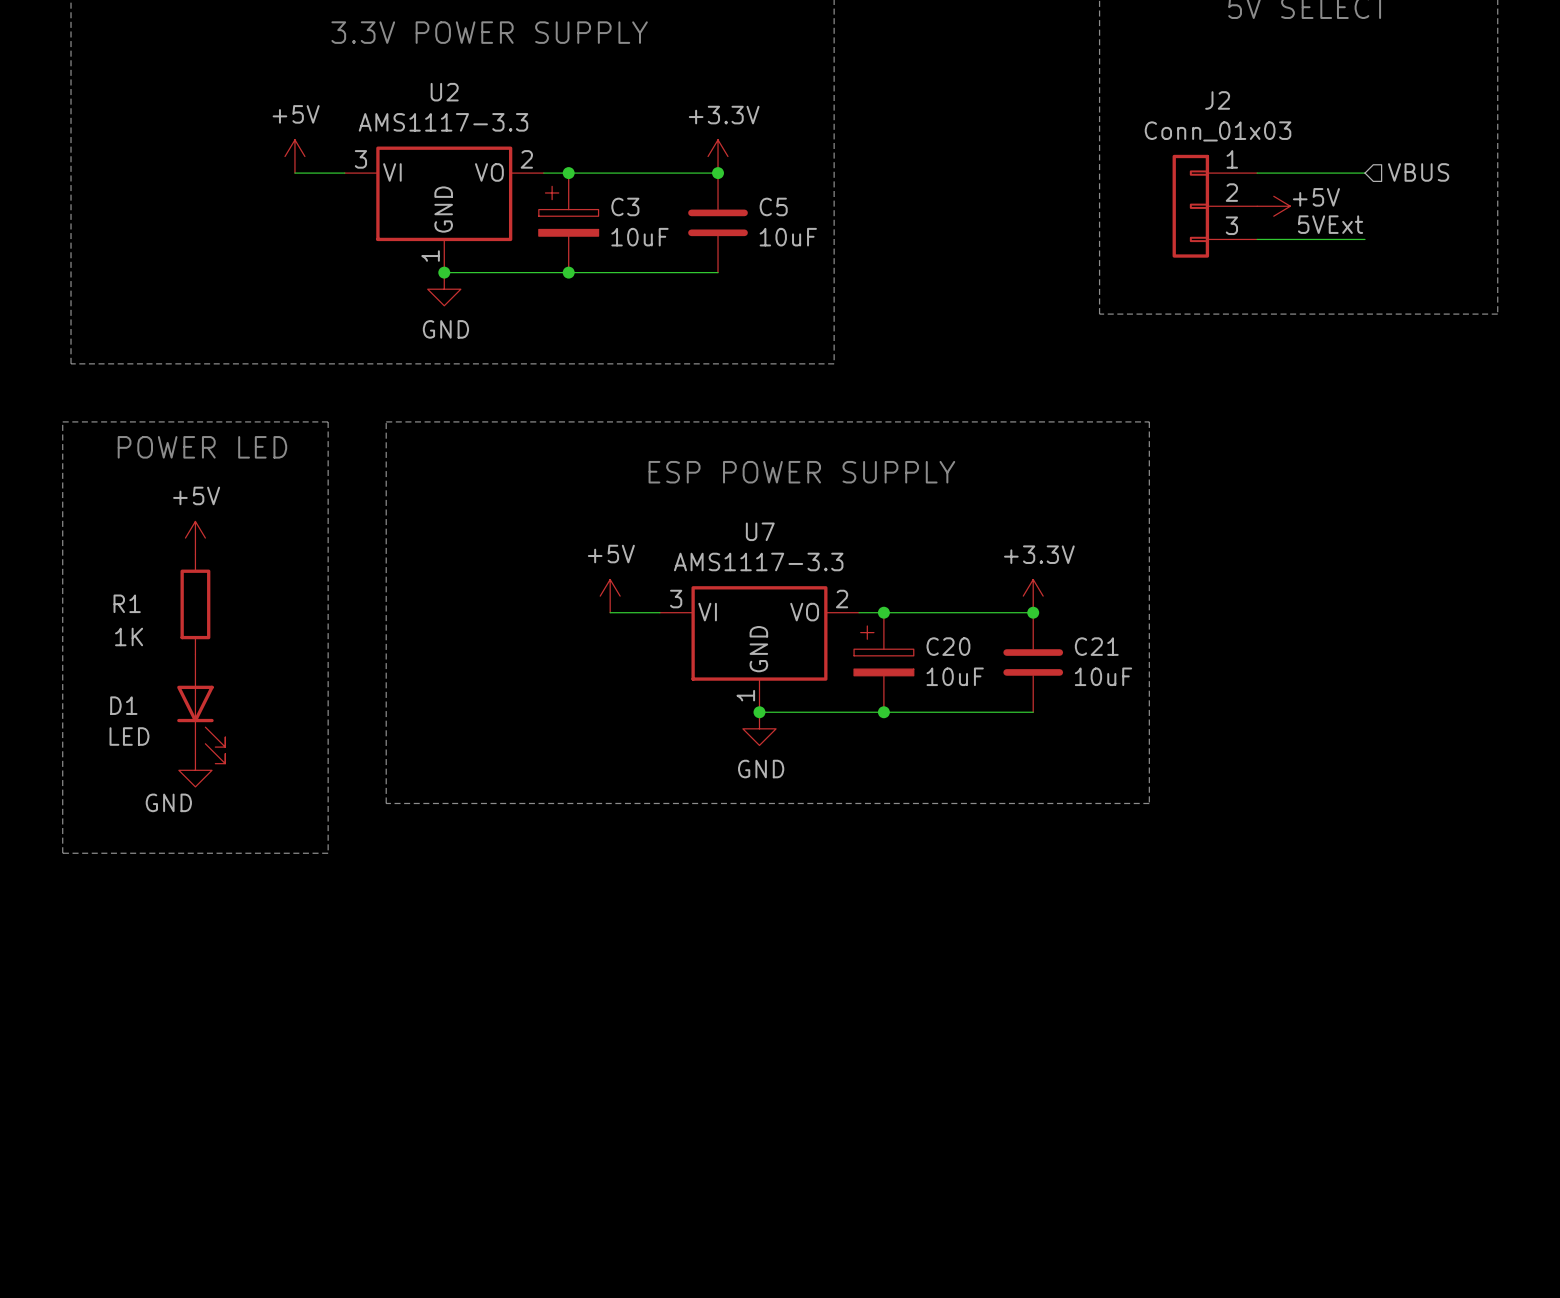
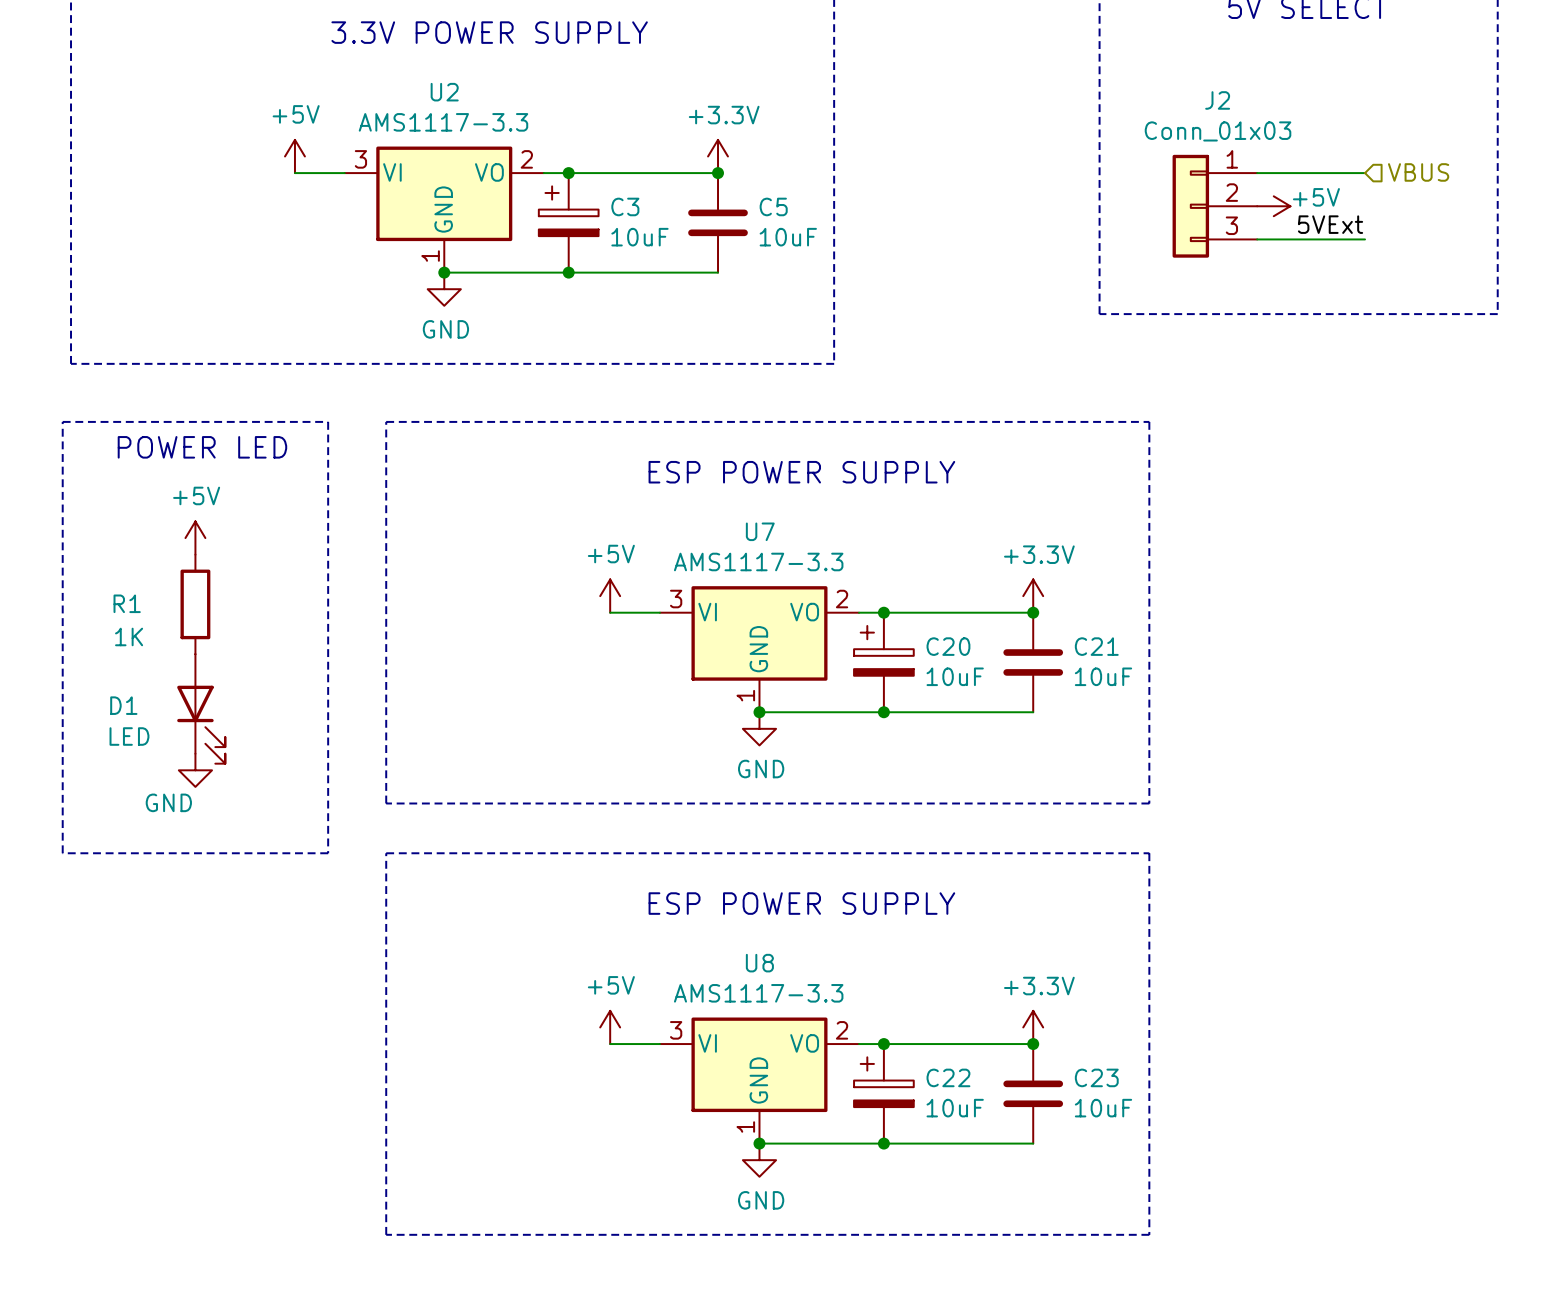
line: none -> (386, 853) (1149, 853) (1149, 1234) (386, 1234) (386, 853)
text: none -> ESP POWER SUPPLY (801, 903)
power symbol: none -> +5V (610, 1027)
power symbol: none -> +3.3V (1033, 1027)
wire: none -> (610, 1044) (659, 1044)
wire: none -> (859, 1044) (1033, 1044)
junction: none -> (883, 1044)
junction: none -> (1033, 1044)
U8: none -> AMS1117-3.3 (759, 1080)
C22: none -> 10uF (883, 1093)
C23: none -> 10uF (1033, 1093)
wire: none -> (759, 1143) (1033, 1143)
junction: none -> (759, 1143)
junction: none -> (883, 1143)
power symbol: none -> GND (759, 1160)

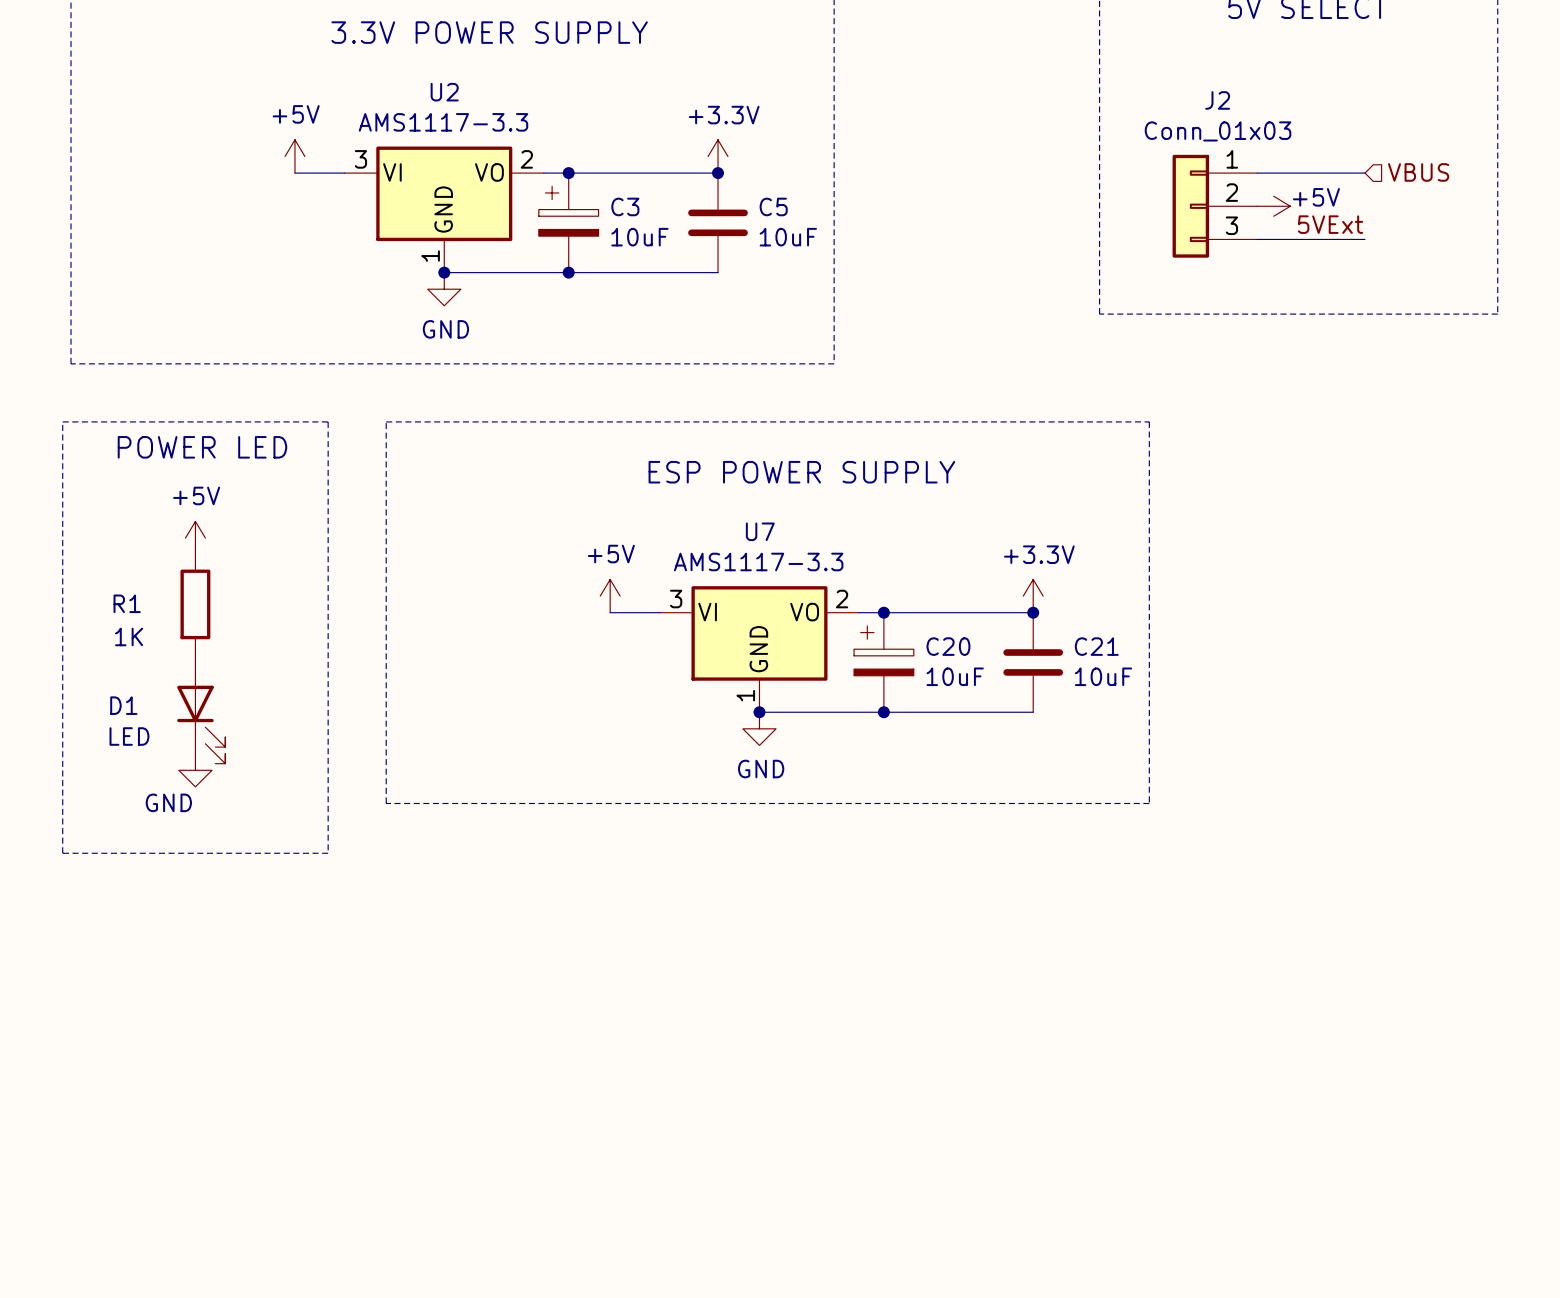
line: (386, 853) (1149, 853) (1149, 1234) (386, 1234) (386, 853) -> none
text: ESP POWER SUPPLY (801, 903) -> none
power symbol: +5V (610, 1027) -> none
power symbol: +3.3V (1033, 1027) -> none
wire: (610, 1044) (659, 1044) -> none
wire: (859, 1044) (1033, 1044) -> none
junction: (883, 1044) -> none
junction: (1033, 1044) -> none
U8: AMS1117-3.3 (759, 1080) -> none
C22: 10uF (883, 1093) -> none
C23: 10uF (1033, 1093) -> none
wire: (759, 1143) (1033, 1143) -> none
junction: (759, 1143) -> none
junction: (883, 1143) -> none
power symbol: GND (759, 1160) -> none

